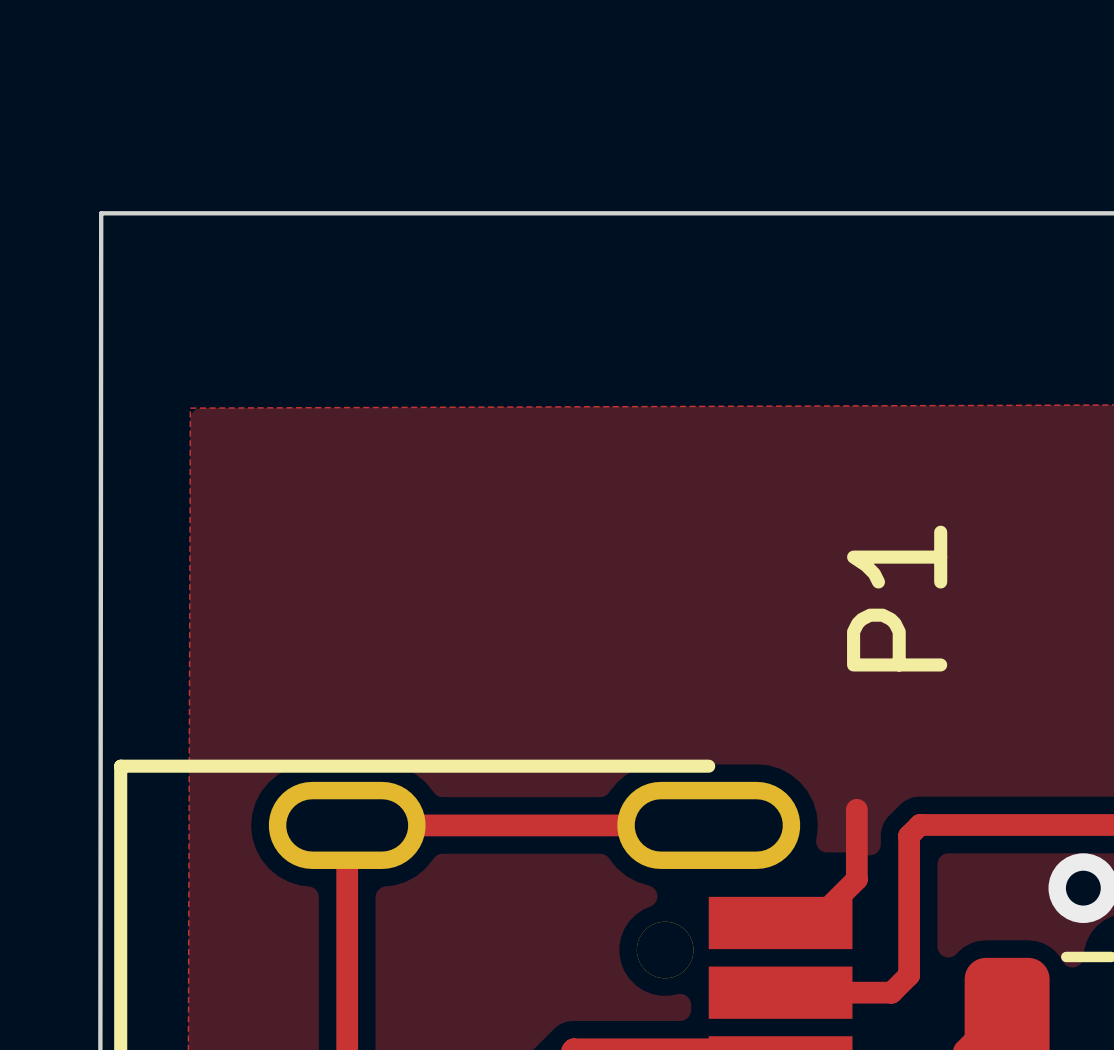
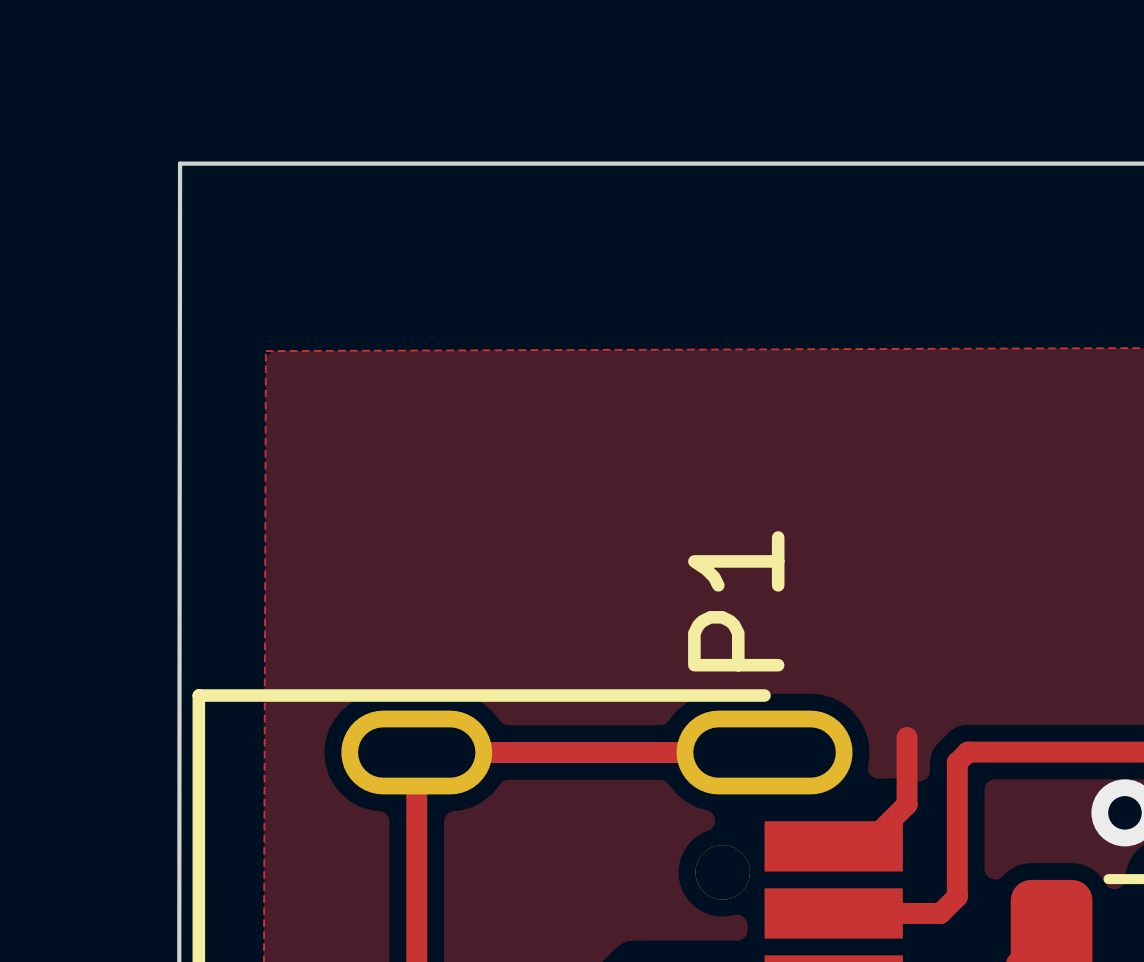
P1 name position: P1 (897, 598) -> P1 (736, 601)

